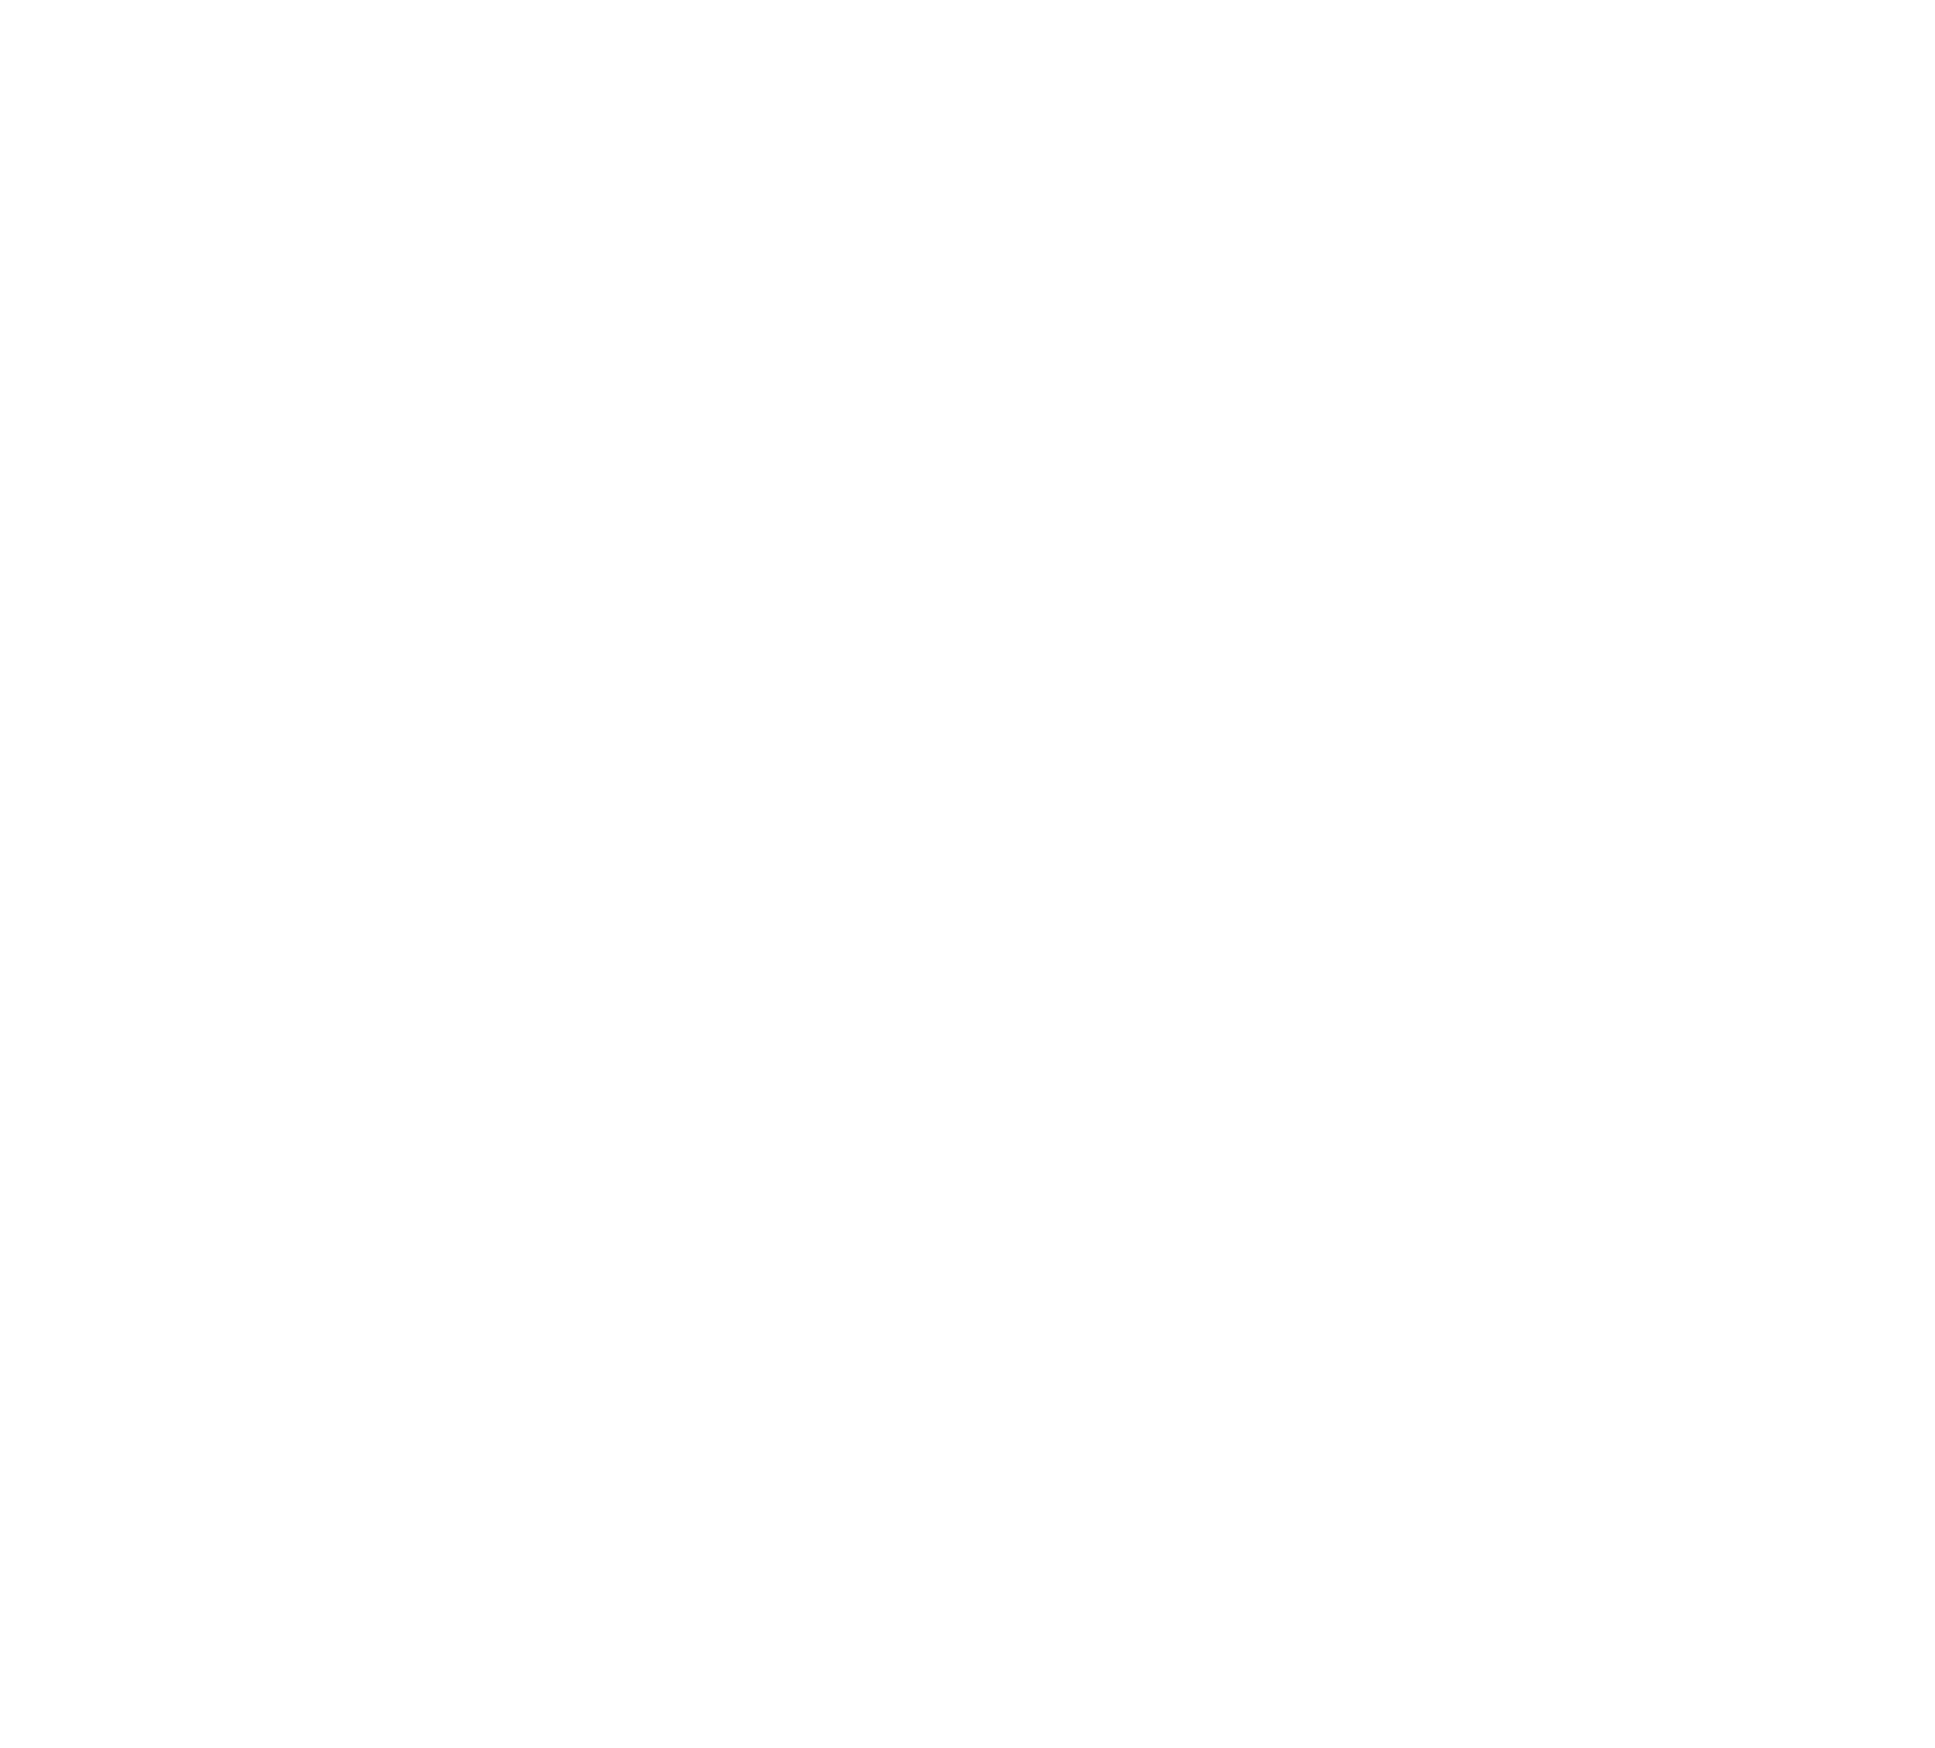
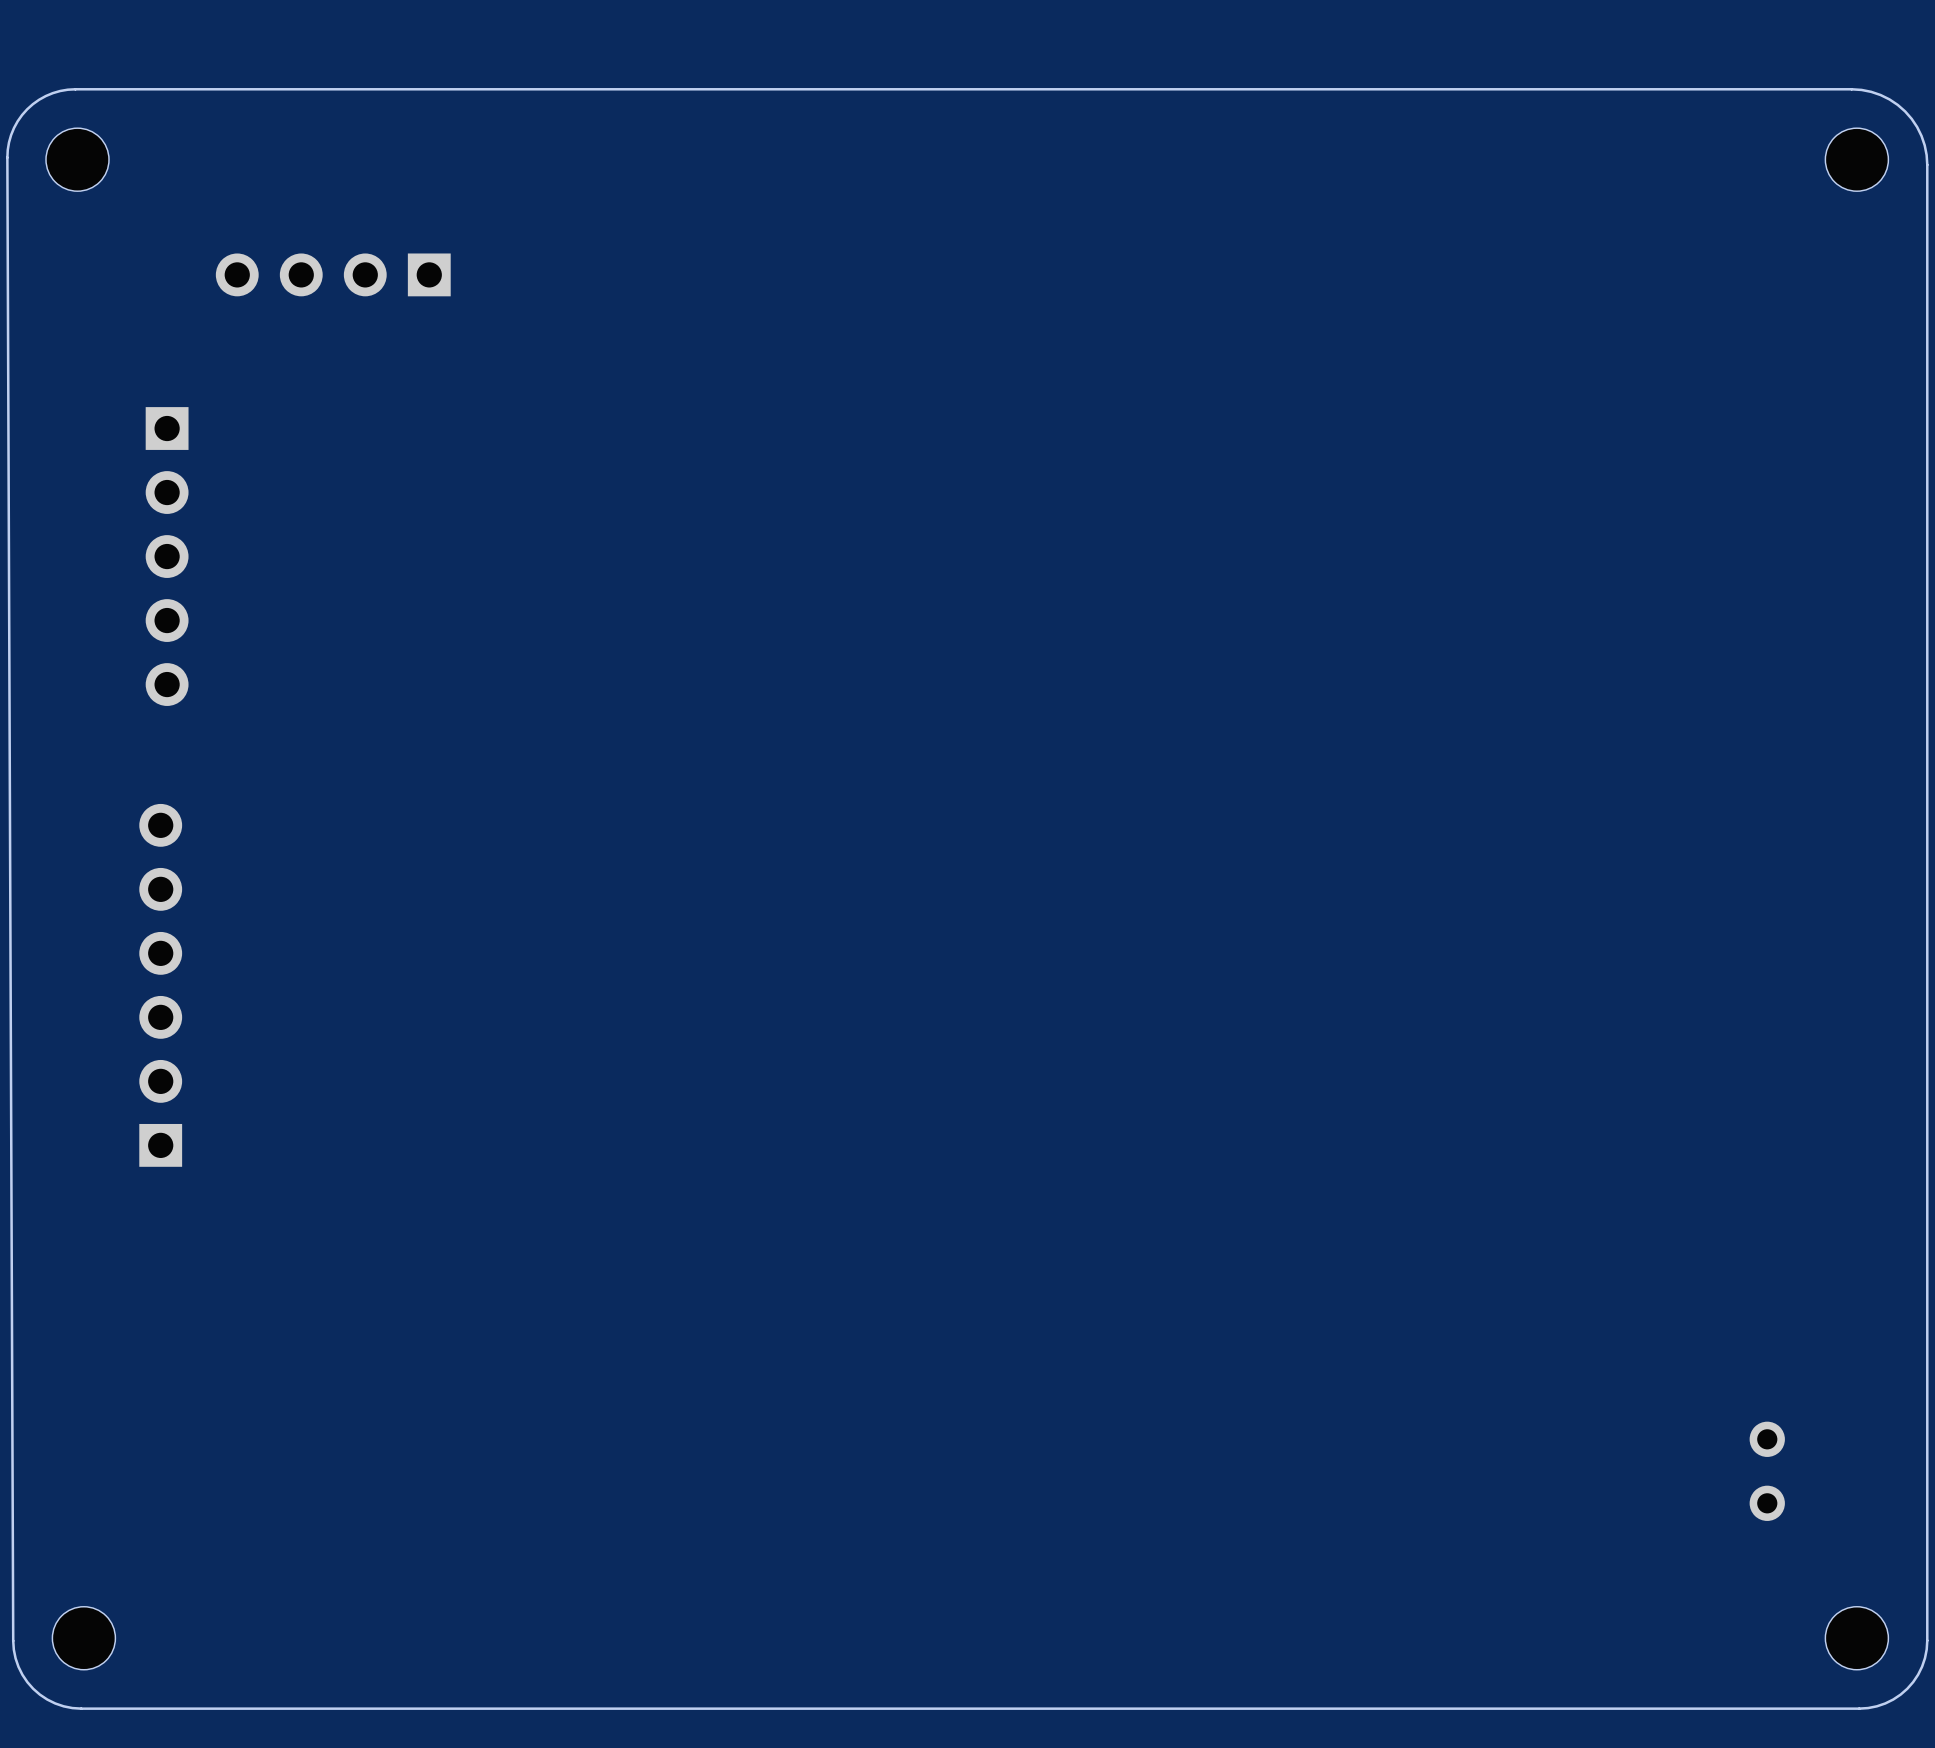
board edge: none -> (1851, 89) (75, 89) (52, 93) (32, 104) (22, 115) (14, 127) (9, 142) (7, 157) (13, 1640) (18, 1666) (27, 1682) (47, 1699) (63, 1706) (81, 1708) (1859, 1708) (1876, 1706) (1900, 1694) (1913, 1682) (1922, 1666) (1927, 1640) (1927, 164) (1921, 135) (1905, 111) (1880, 95) (1851, 89)
part: none -> (77, 159)
part: none -> (1856, 159)
part: none -> (333, 274)
part: none -> (167, 556)
part: none -> (160, 985)
part: none -> (1767, 1471)
part: none -> (83, 1638)
part: none -> (1856, 1638)

